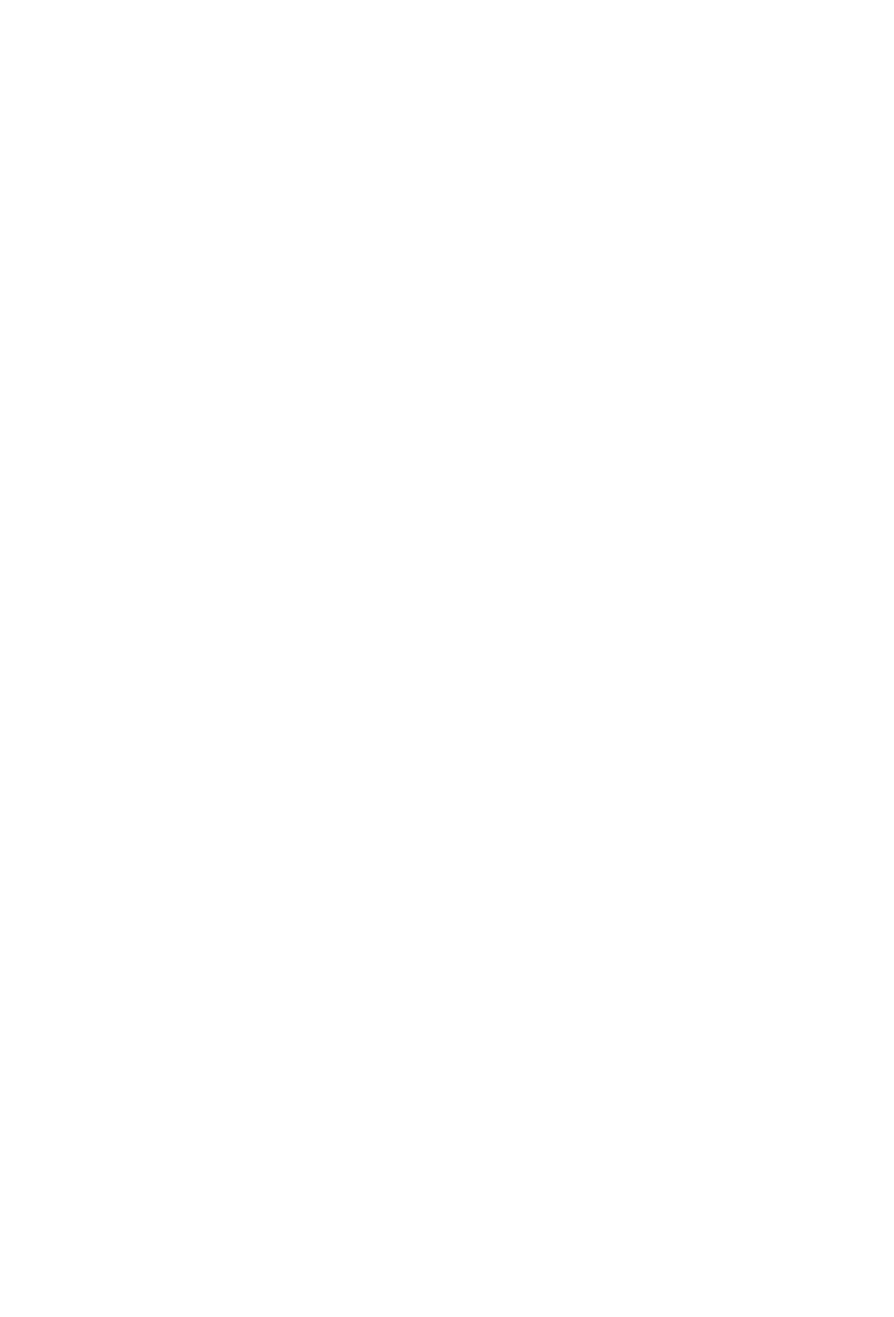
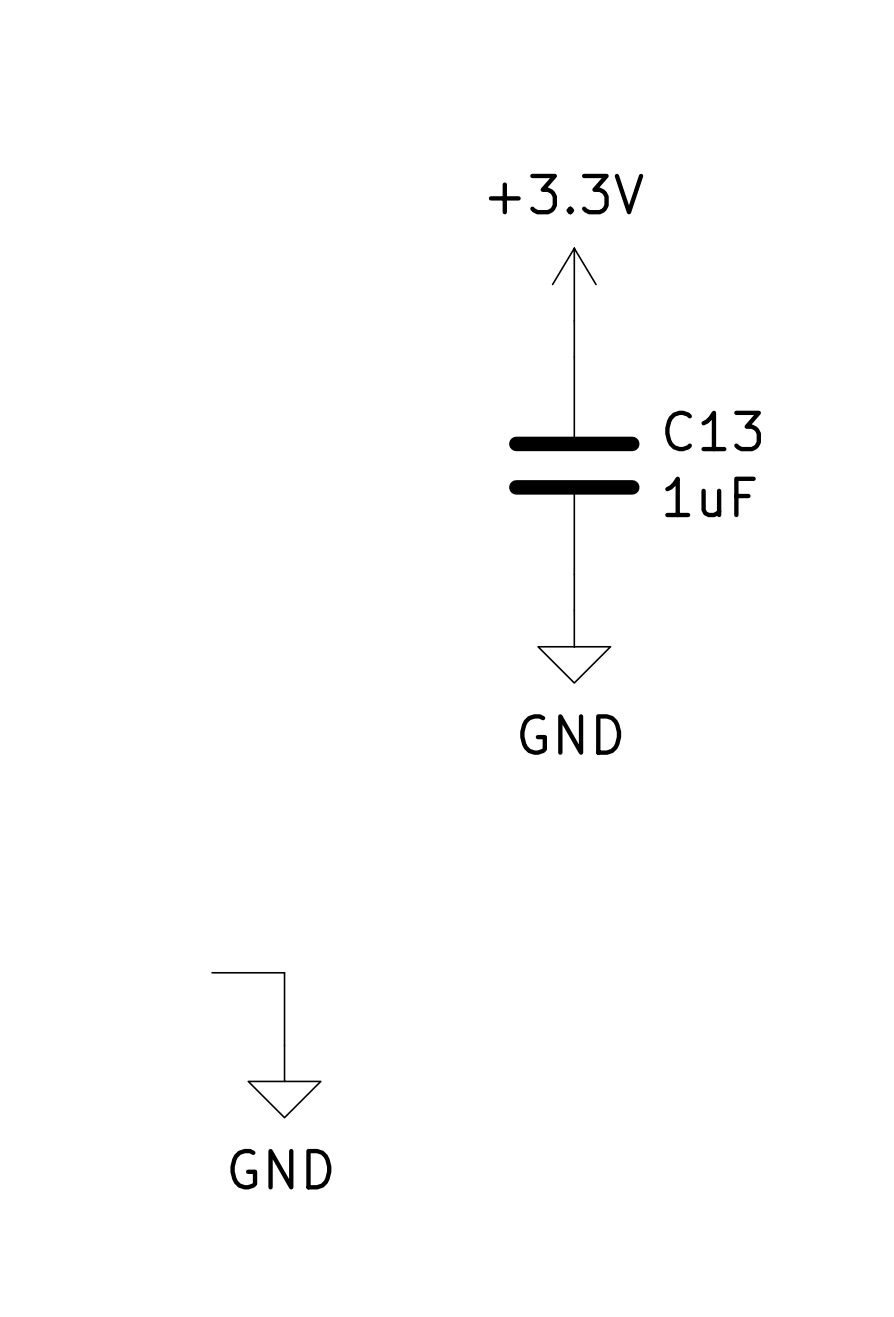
power symbol: none -> +3.3V (574, 284)
wire: none -> (574, 320) (574, 356)
C13: none -> 1uF (574, 465)
wire: none -> (574, 574) (574, 610)
power symbol: none -> GND (574, 646)
wire: none -> (212, 972) (284, 972) (284, 1045)
power symbol: none -> GND (284, 1081)

